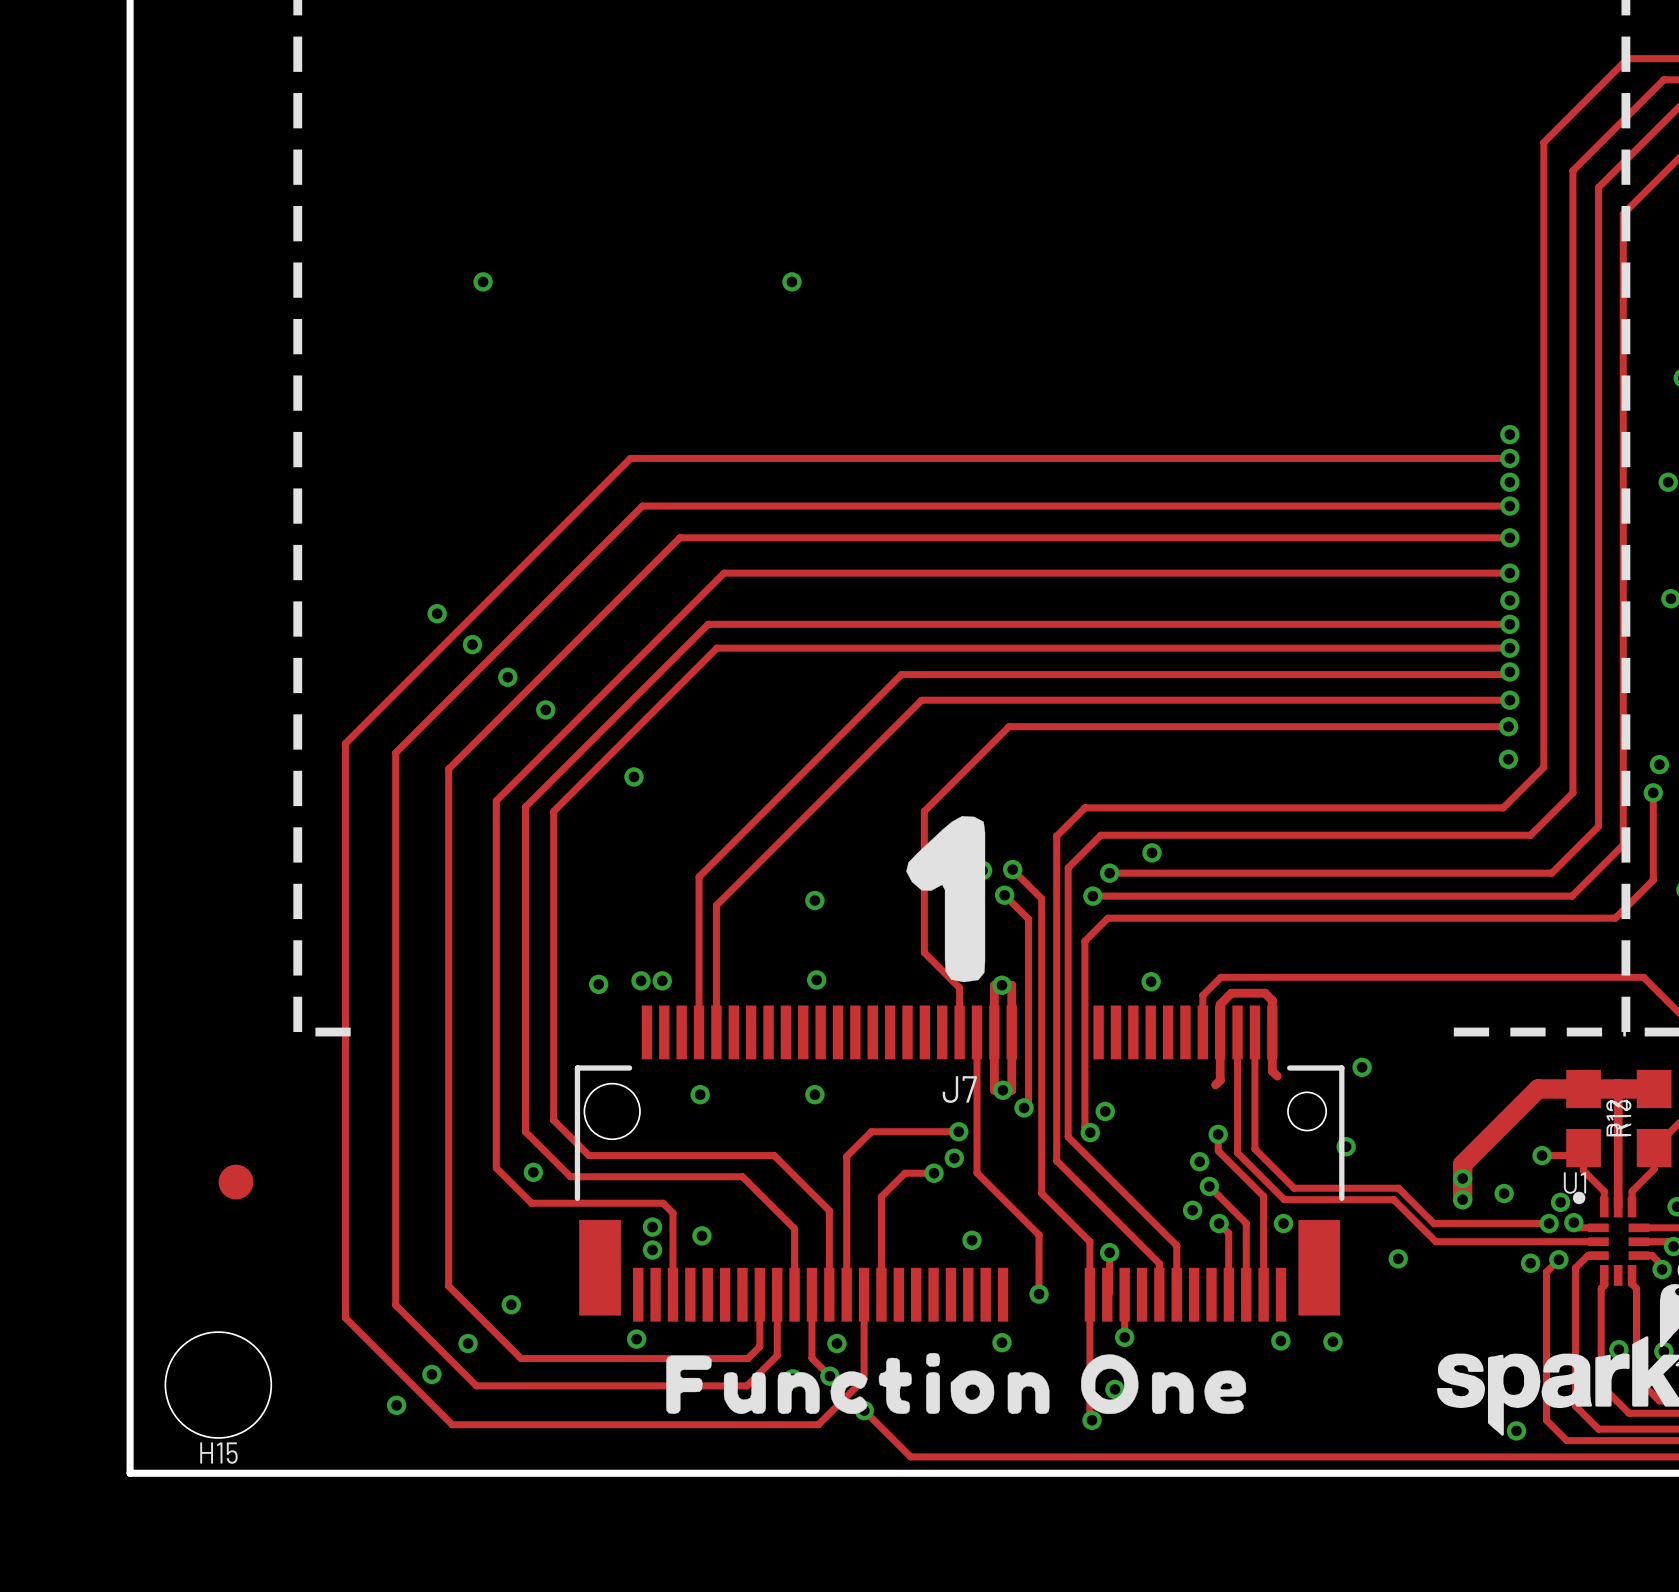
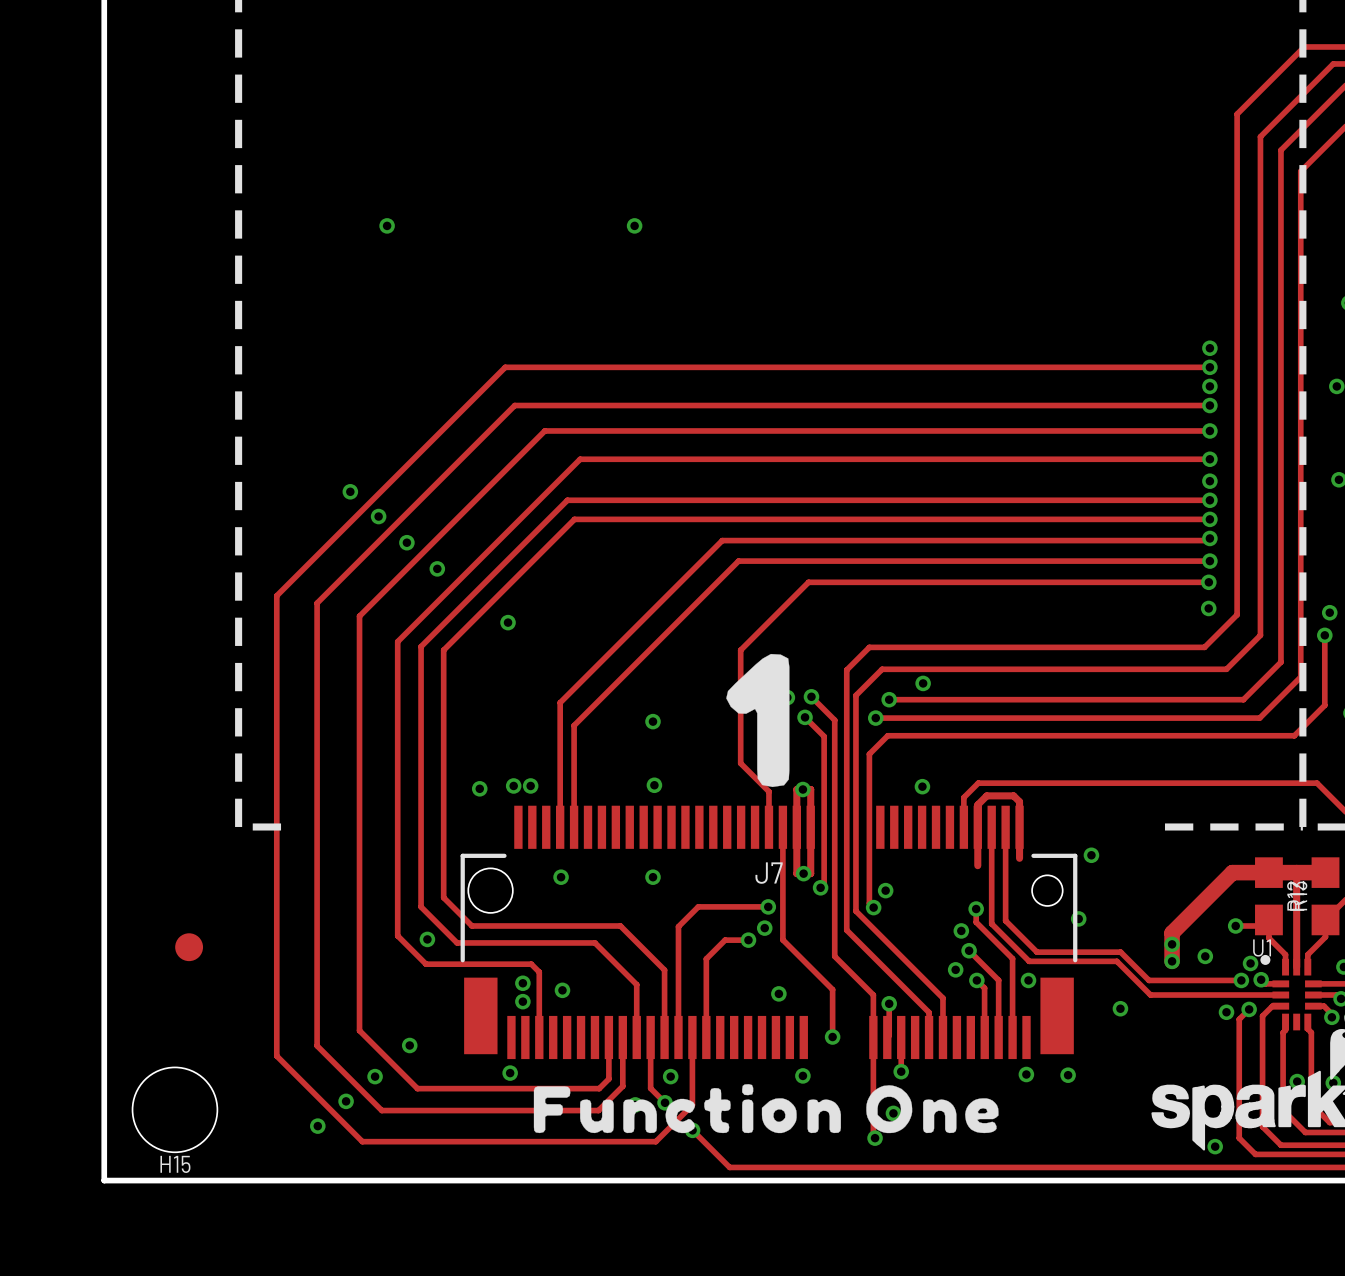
track: (1272, 1071) (1277, 1076) -> none
track: (1220, 1080) (1215, 1084) -> none

